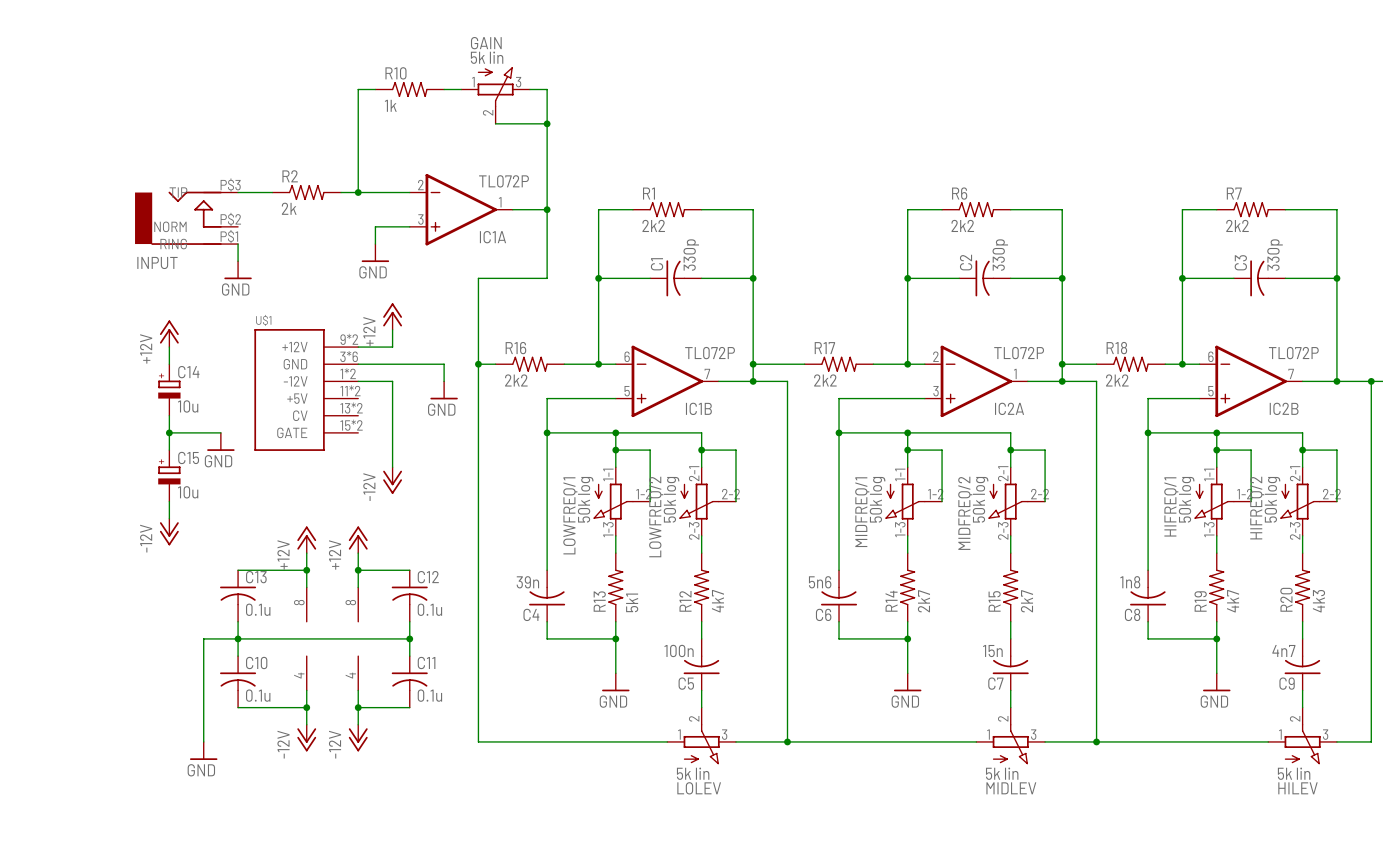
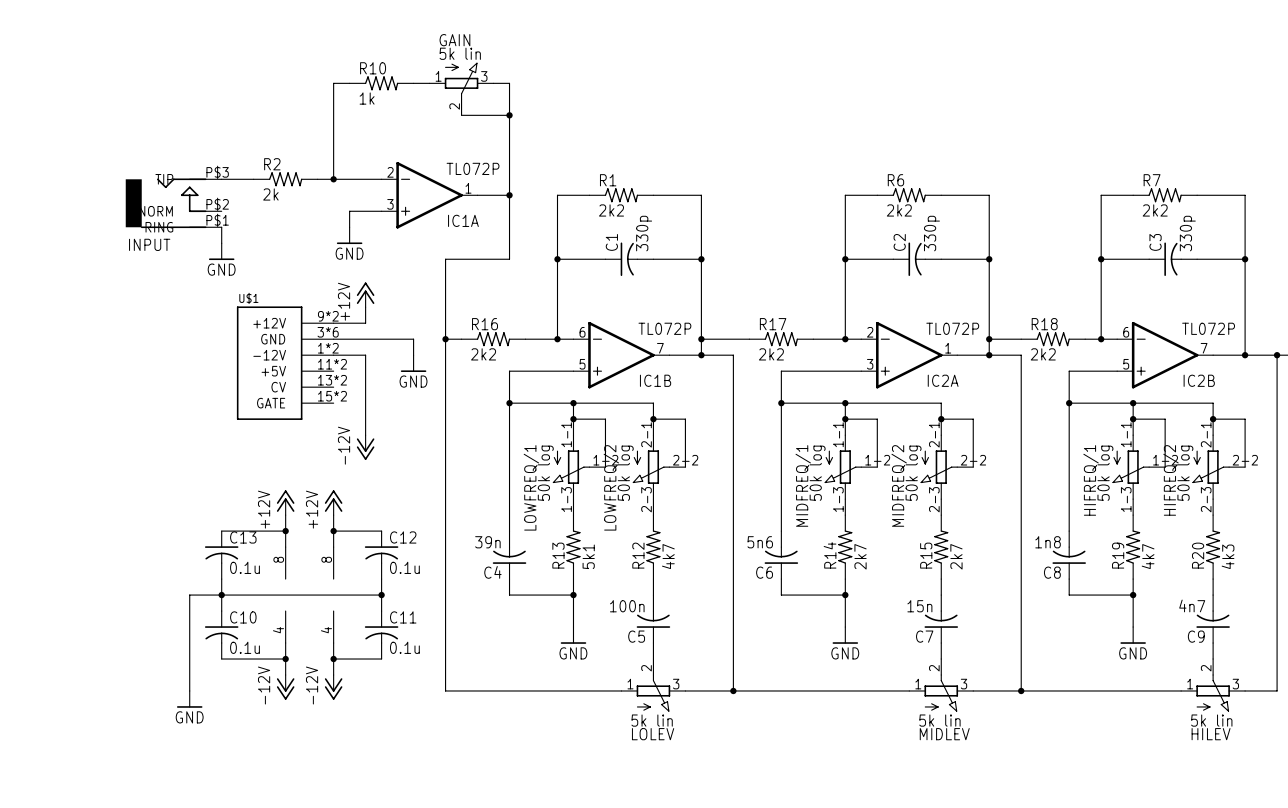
power symbol: +12V (169, 333) -> none
wire: (169, 347) (169, 364) -> none
C14: 10u (169, 389) -> none
wire: (169, 415) (169, 450) -> none
wire: (169, 432) (220, 432) -> none
junction: (169, 432) -> none
power symbol: GND (220, 441) -> none
C15: 10u (169, 475) -> none
wire: (169, 501) (169, 518) -> none
power symbol: -12V (169, 532) -> none

